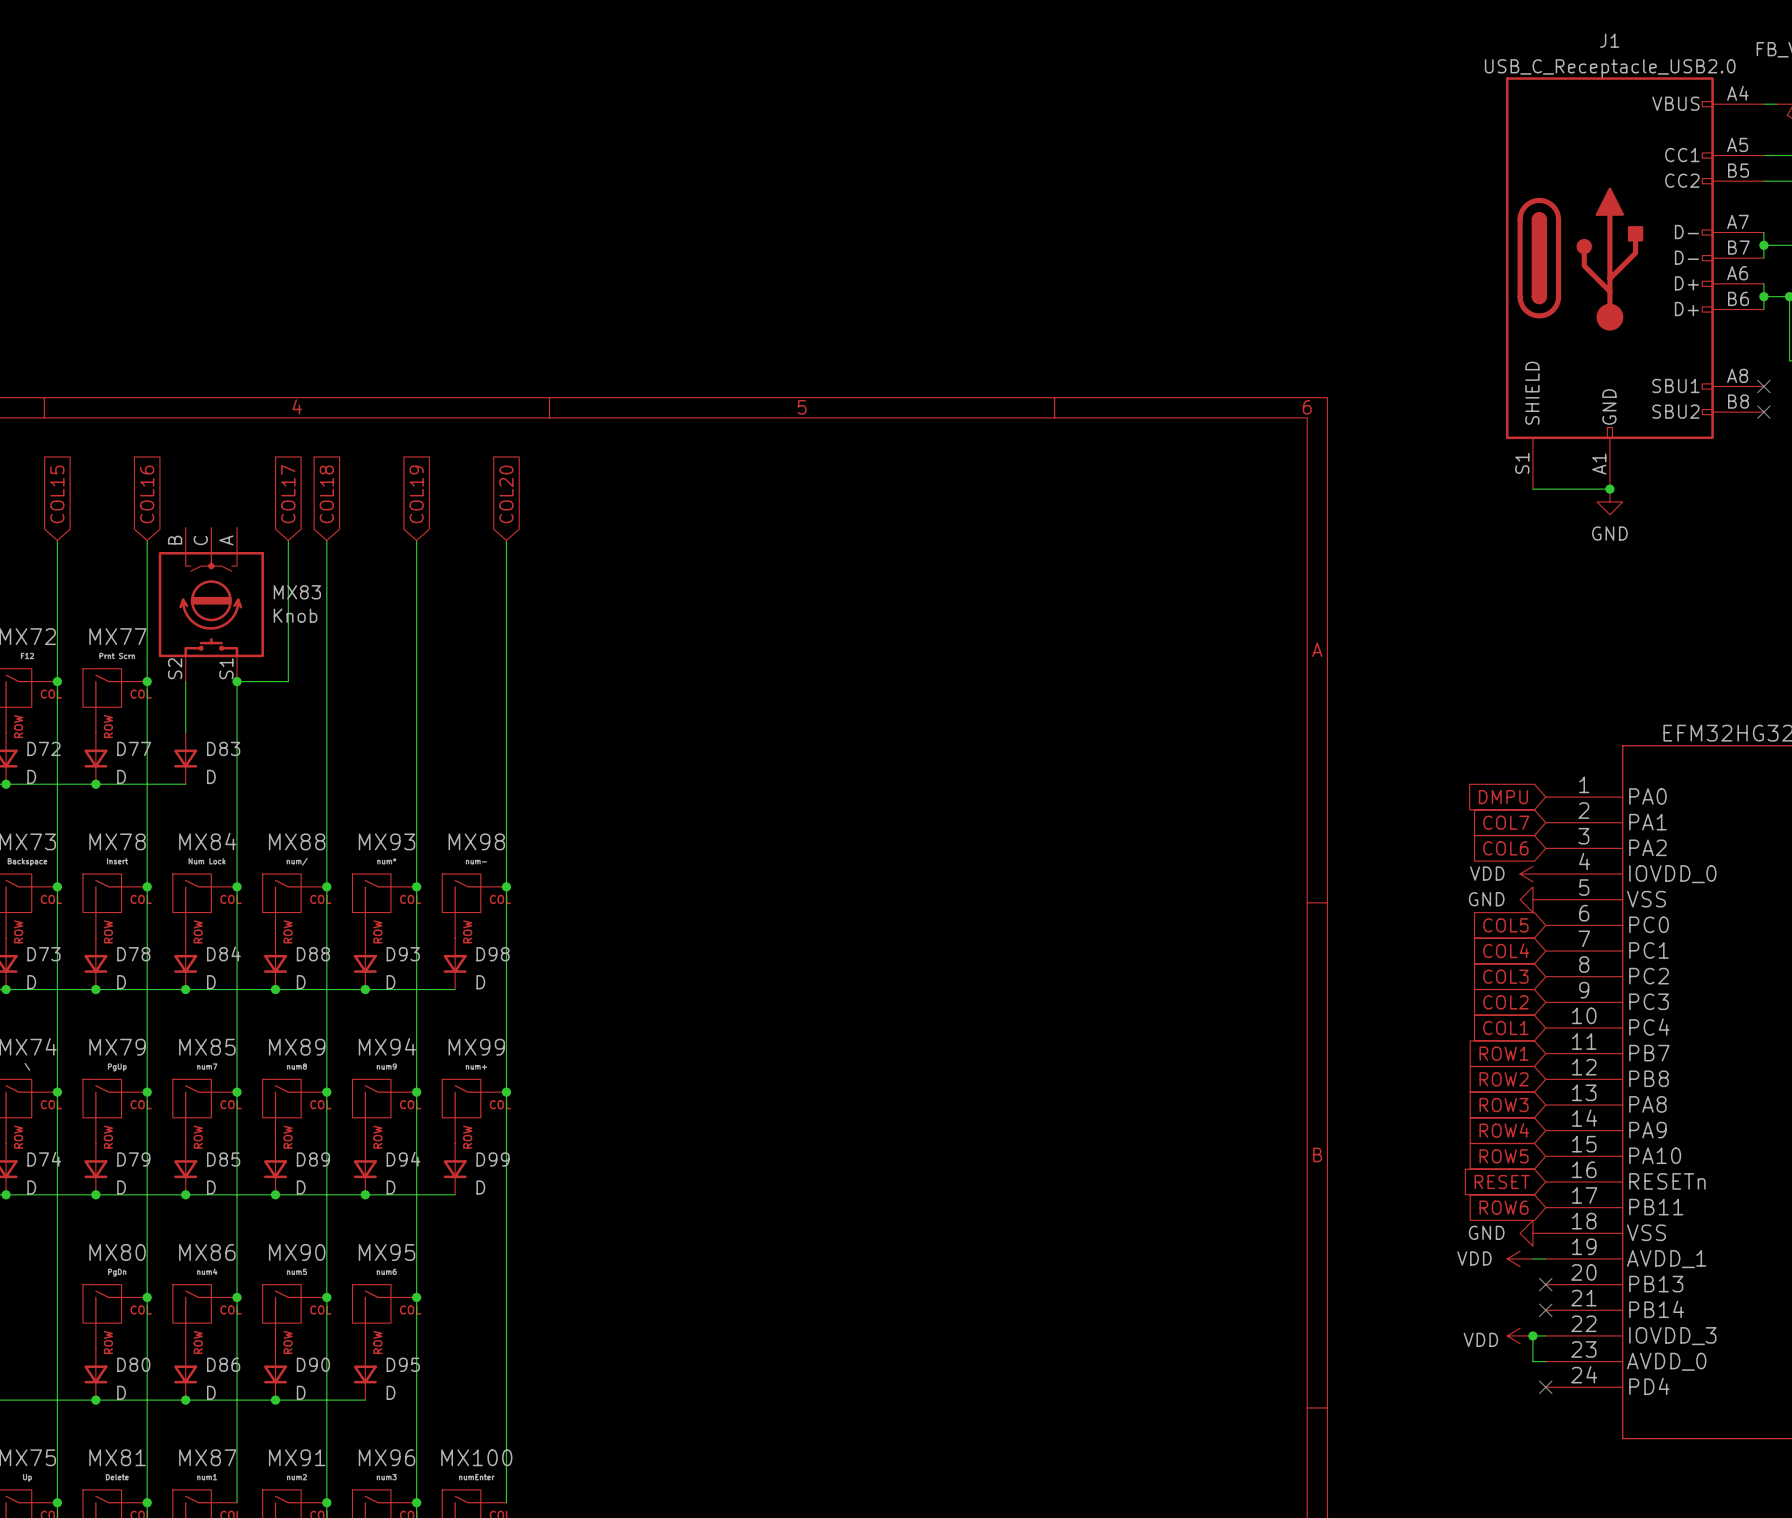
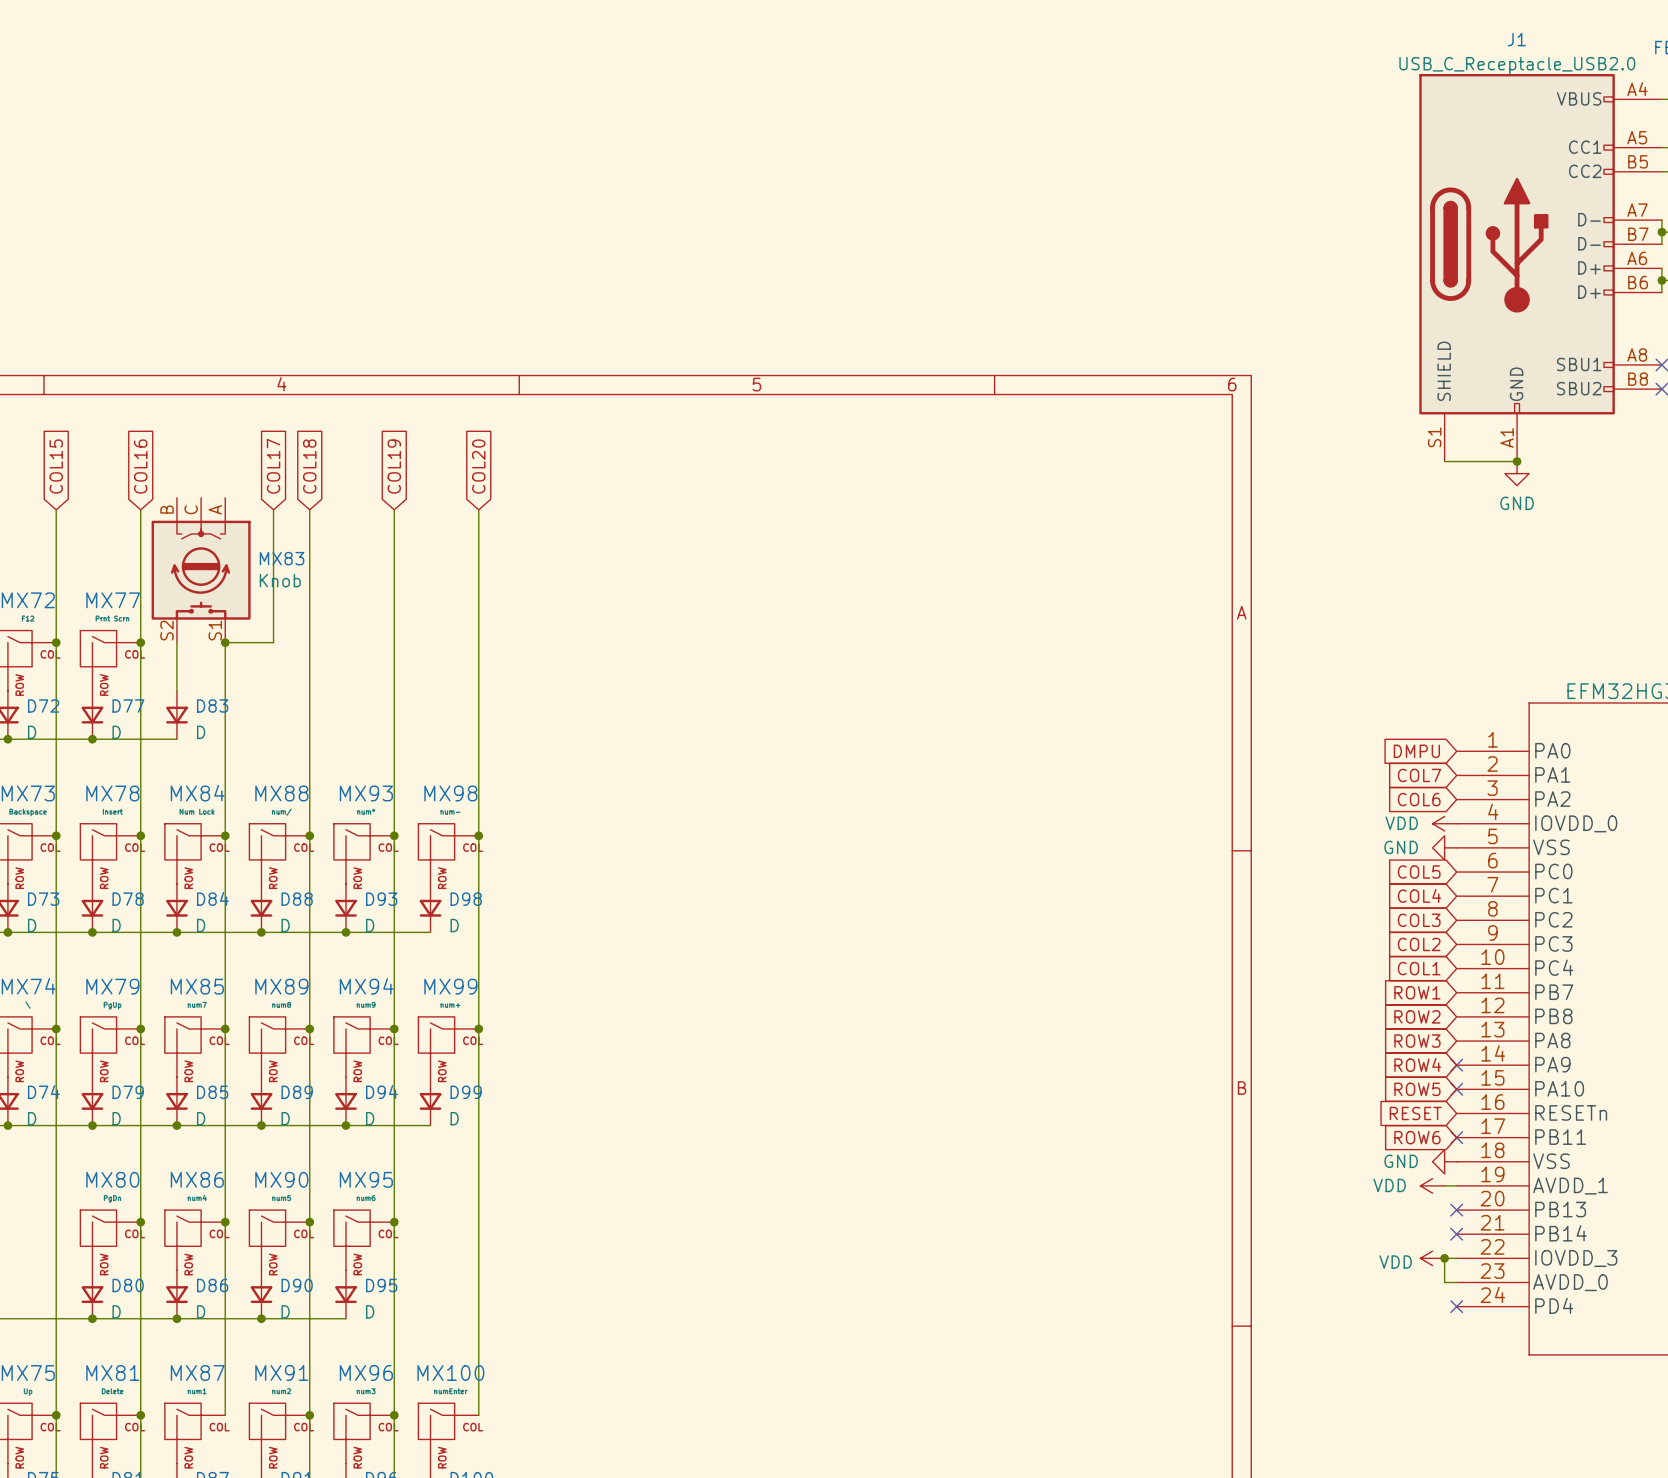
no-connect mark: none -> (1456, 1065)
no-connect mark: none -> (1456, 1089)
no-connect mark: none -> (1456, 1137)

